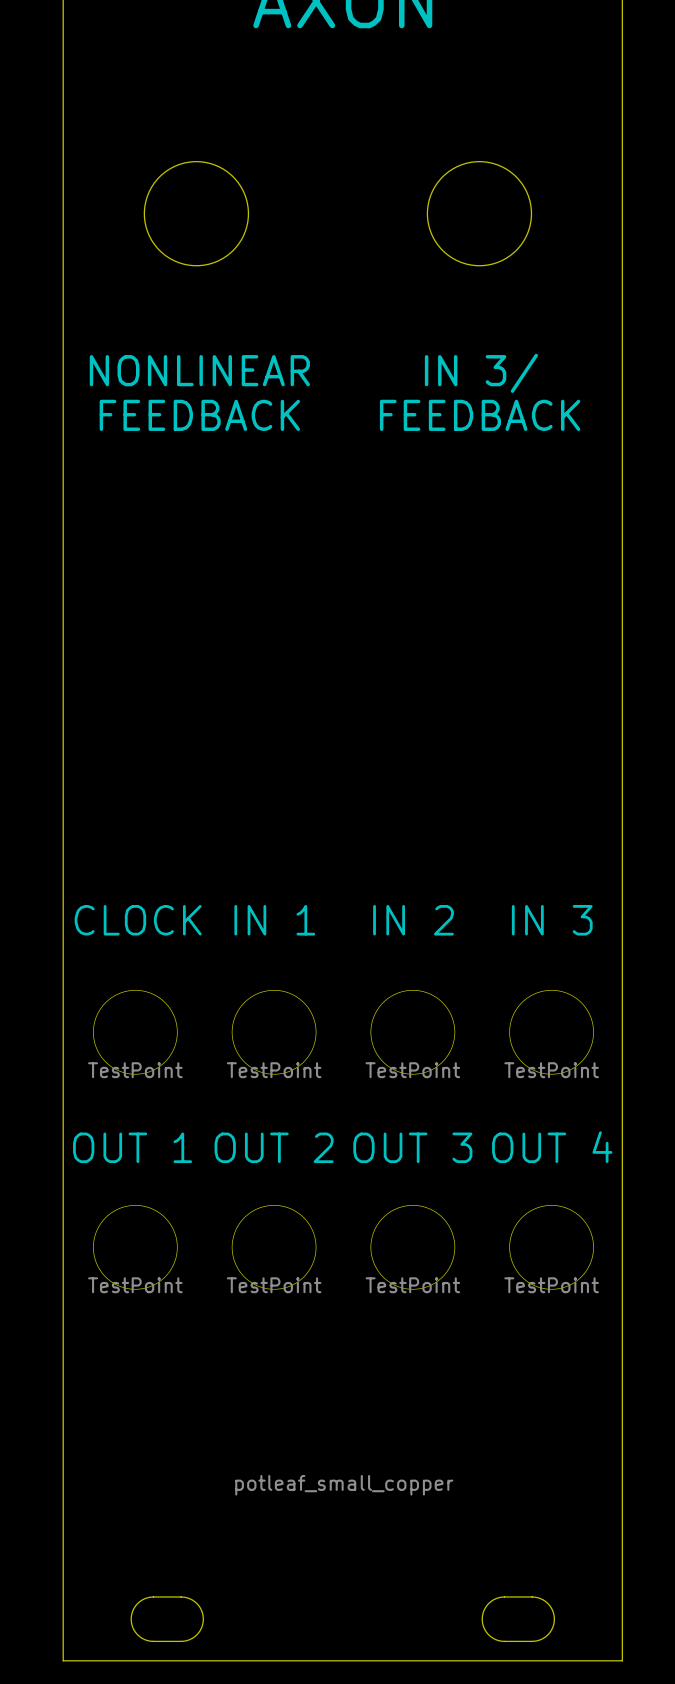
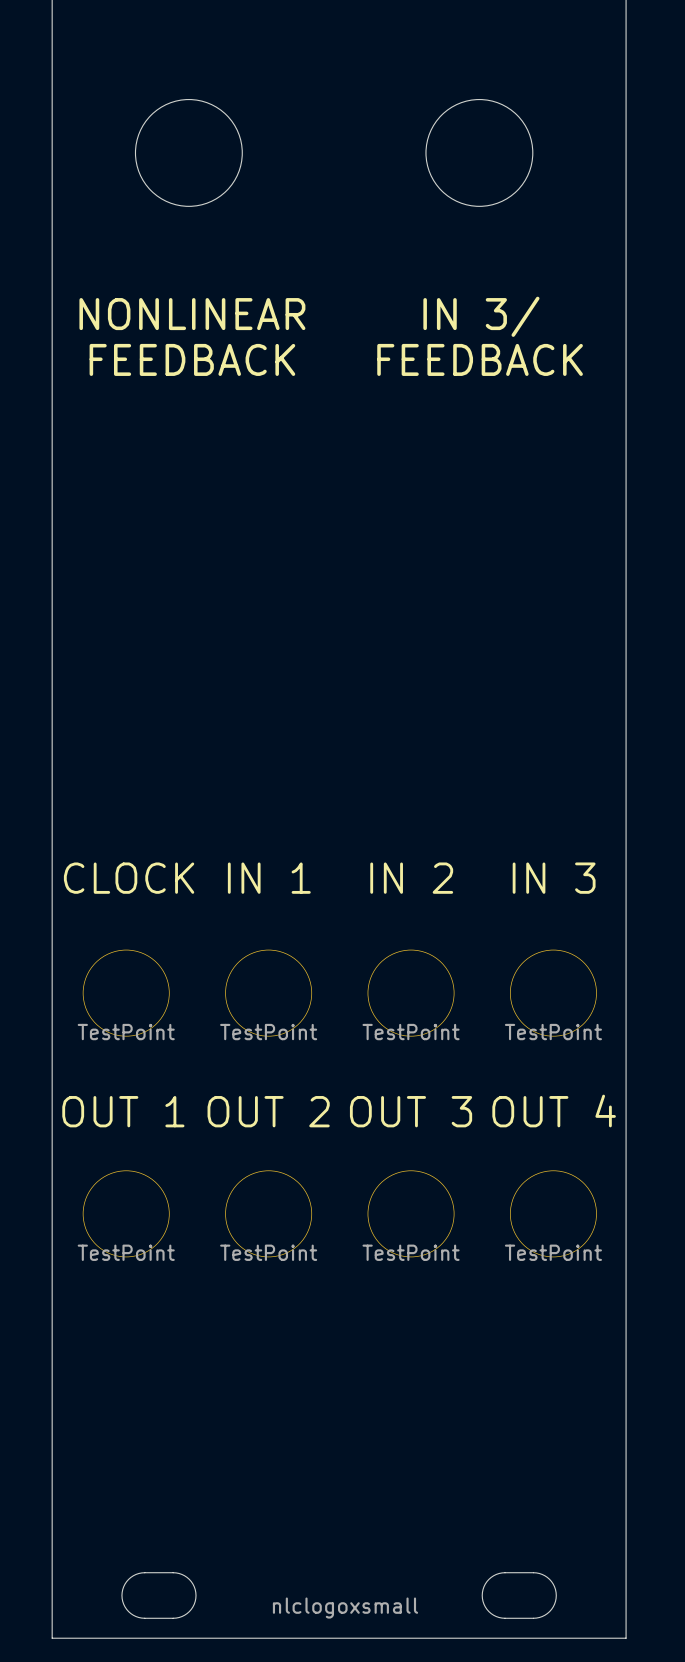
drawing: [235, 1474, 454, 1496] -> none
drawing: none -> [272, 1597, 419, 1619]

